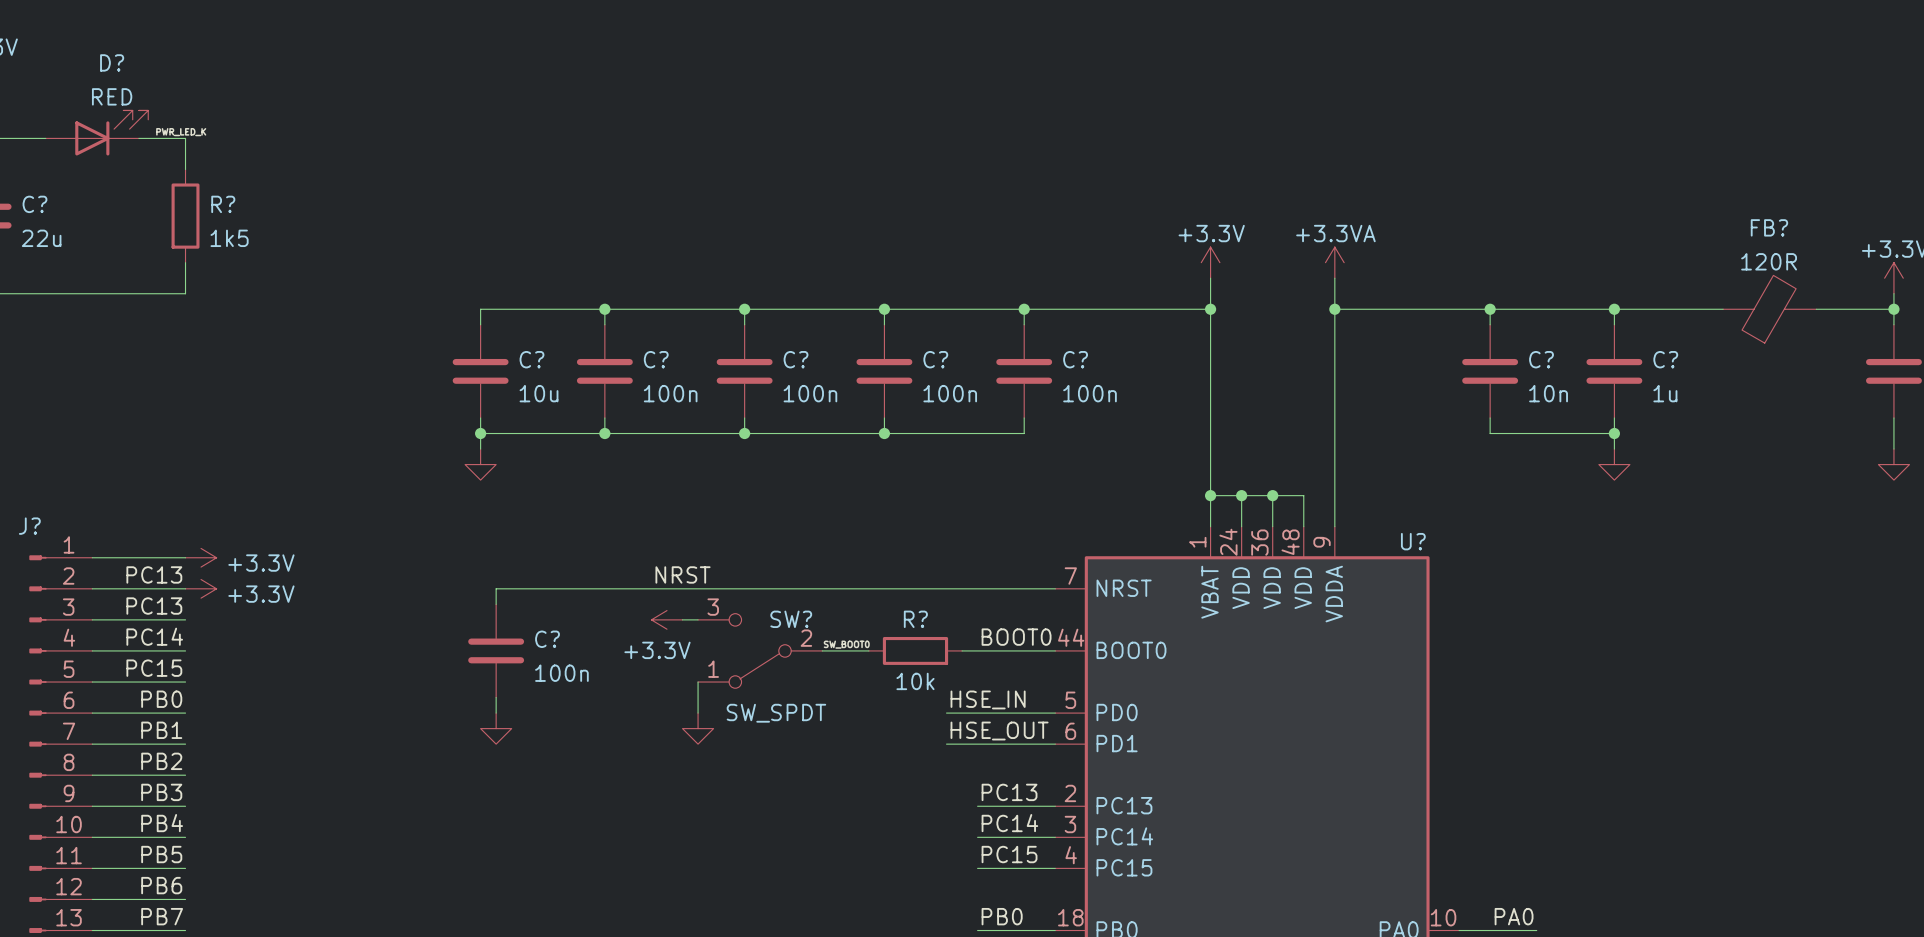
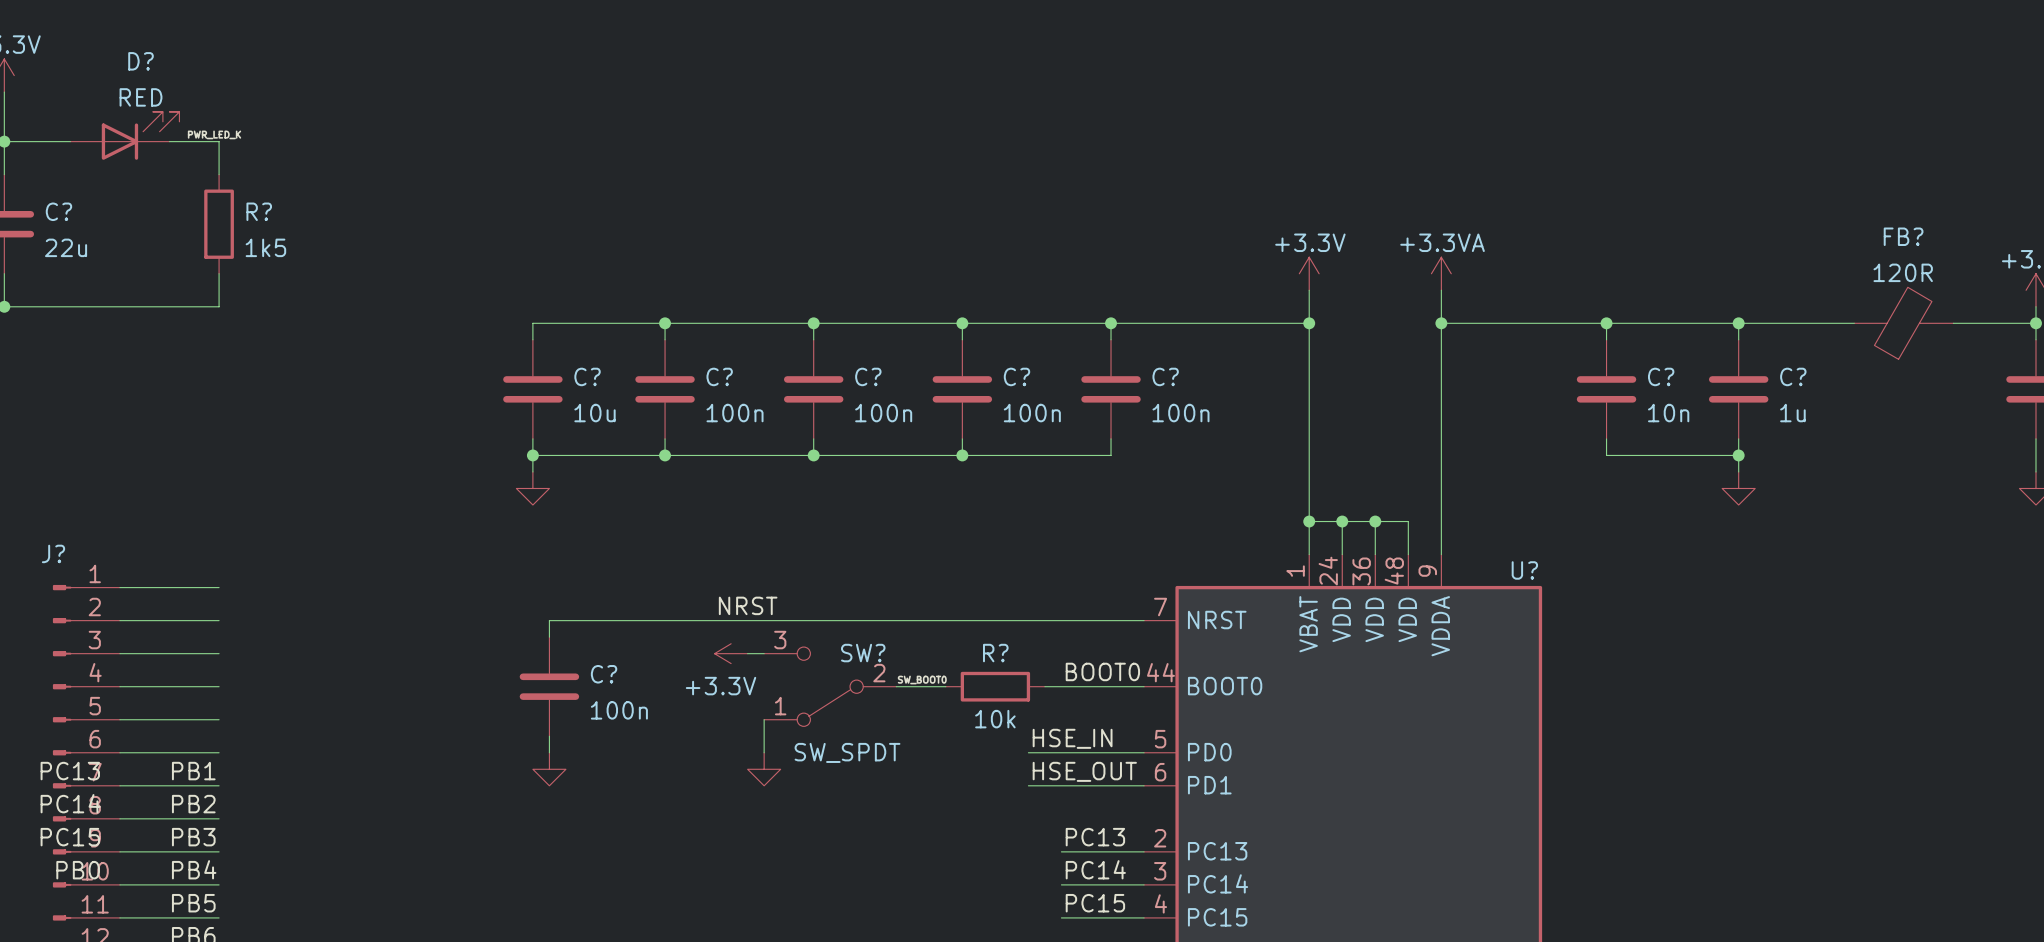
power symbol: +3.3V (201, 557) -> none
label: PC13 (154, 574) -> none
power symbol: +3.3V (201, 588) -> none
label: PC13 (154, 606) -> none
label position: PC14 (154, 636) -> PC14 (70, 803)
label position: PC15 (154, 668) -> PC15 (70, 837)
label position: PB0 (161, 699) -> PB0 (78, 870)
label: none -> PC13 (70, 771)

